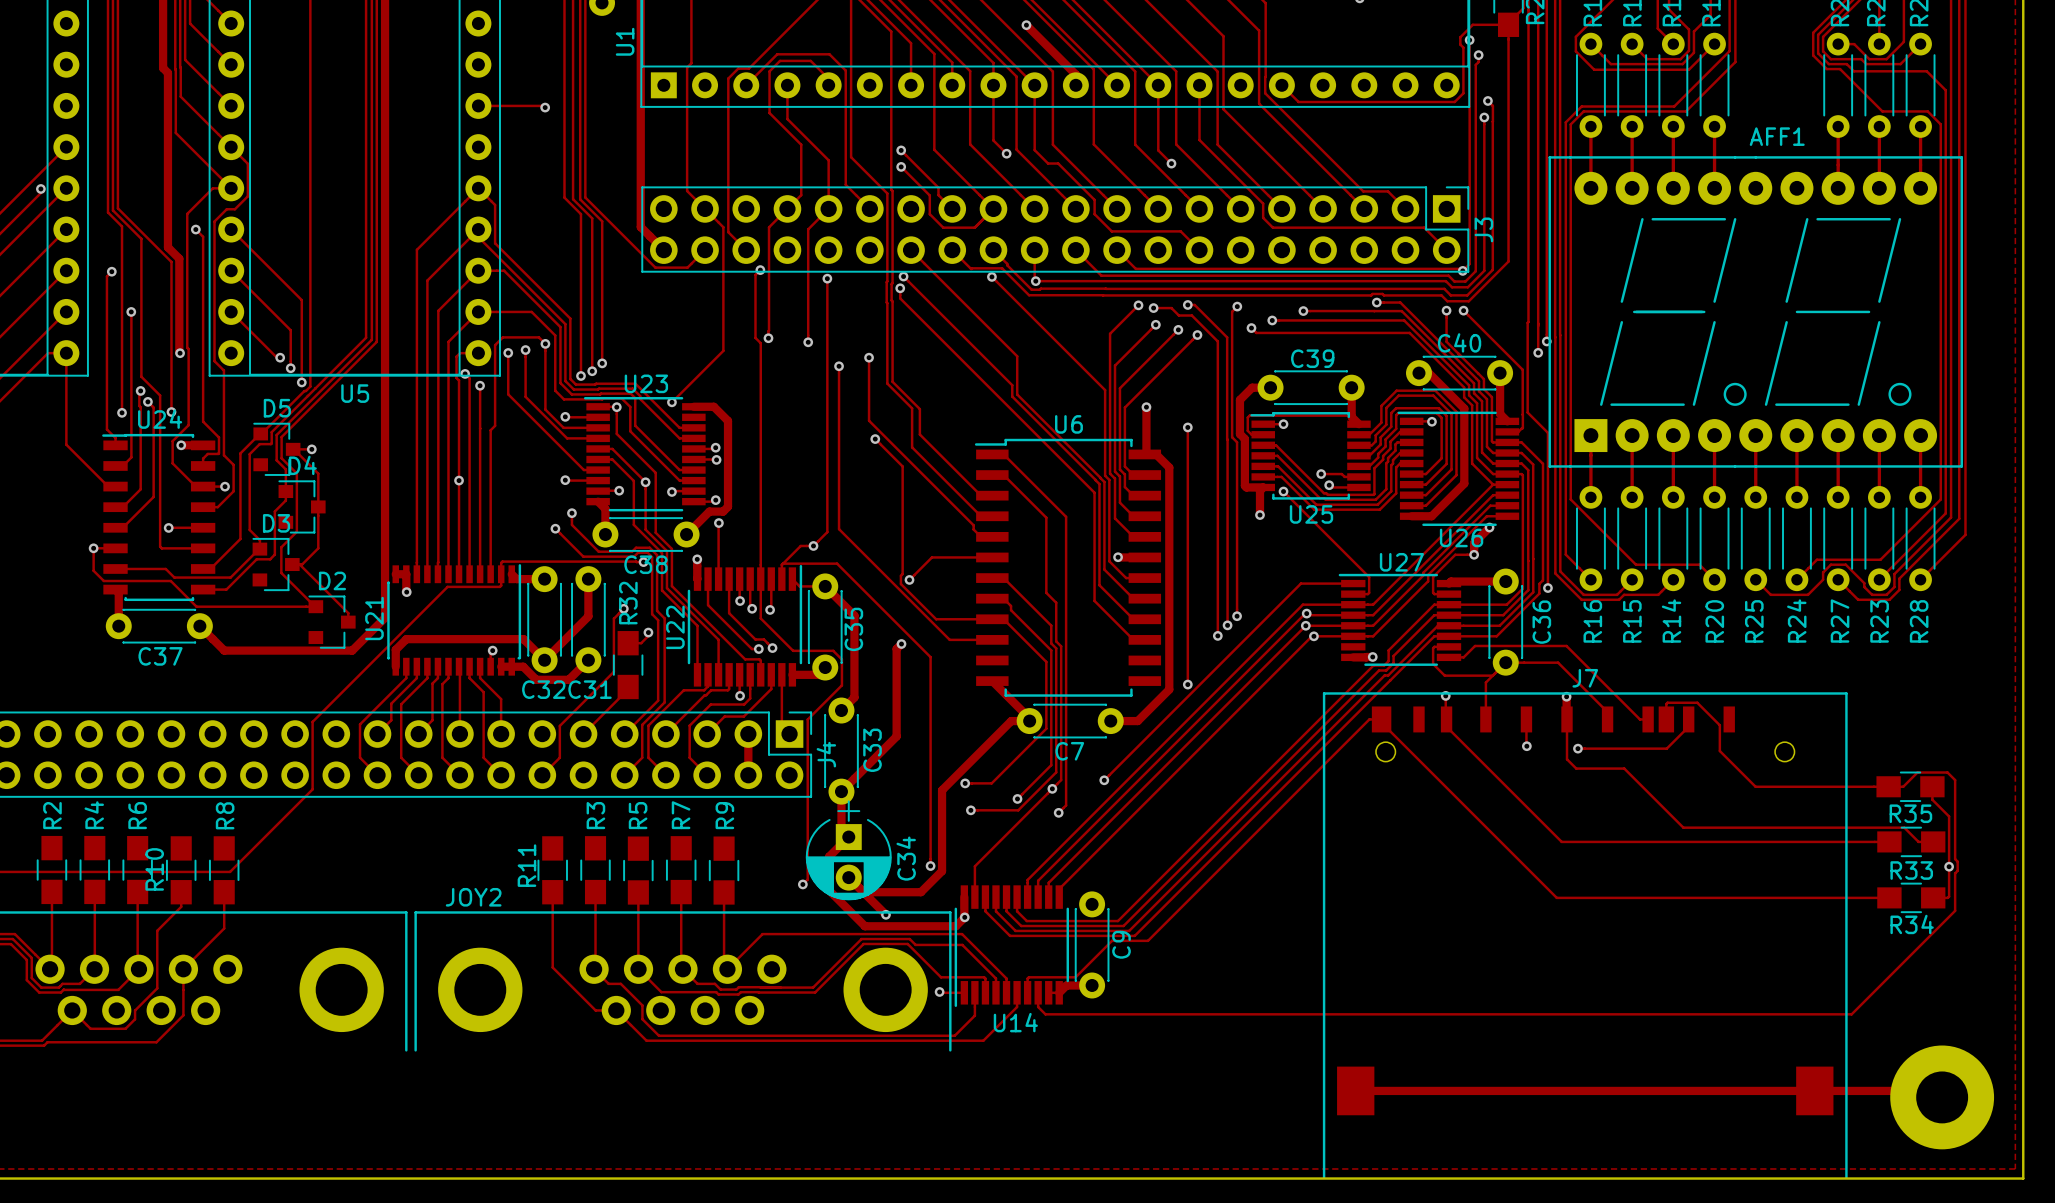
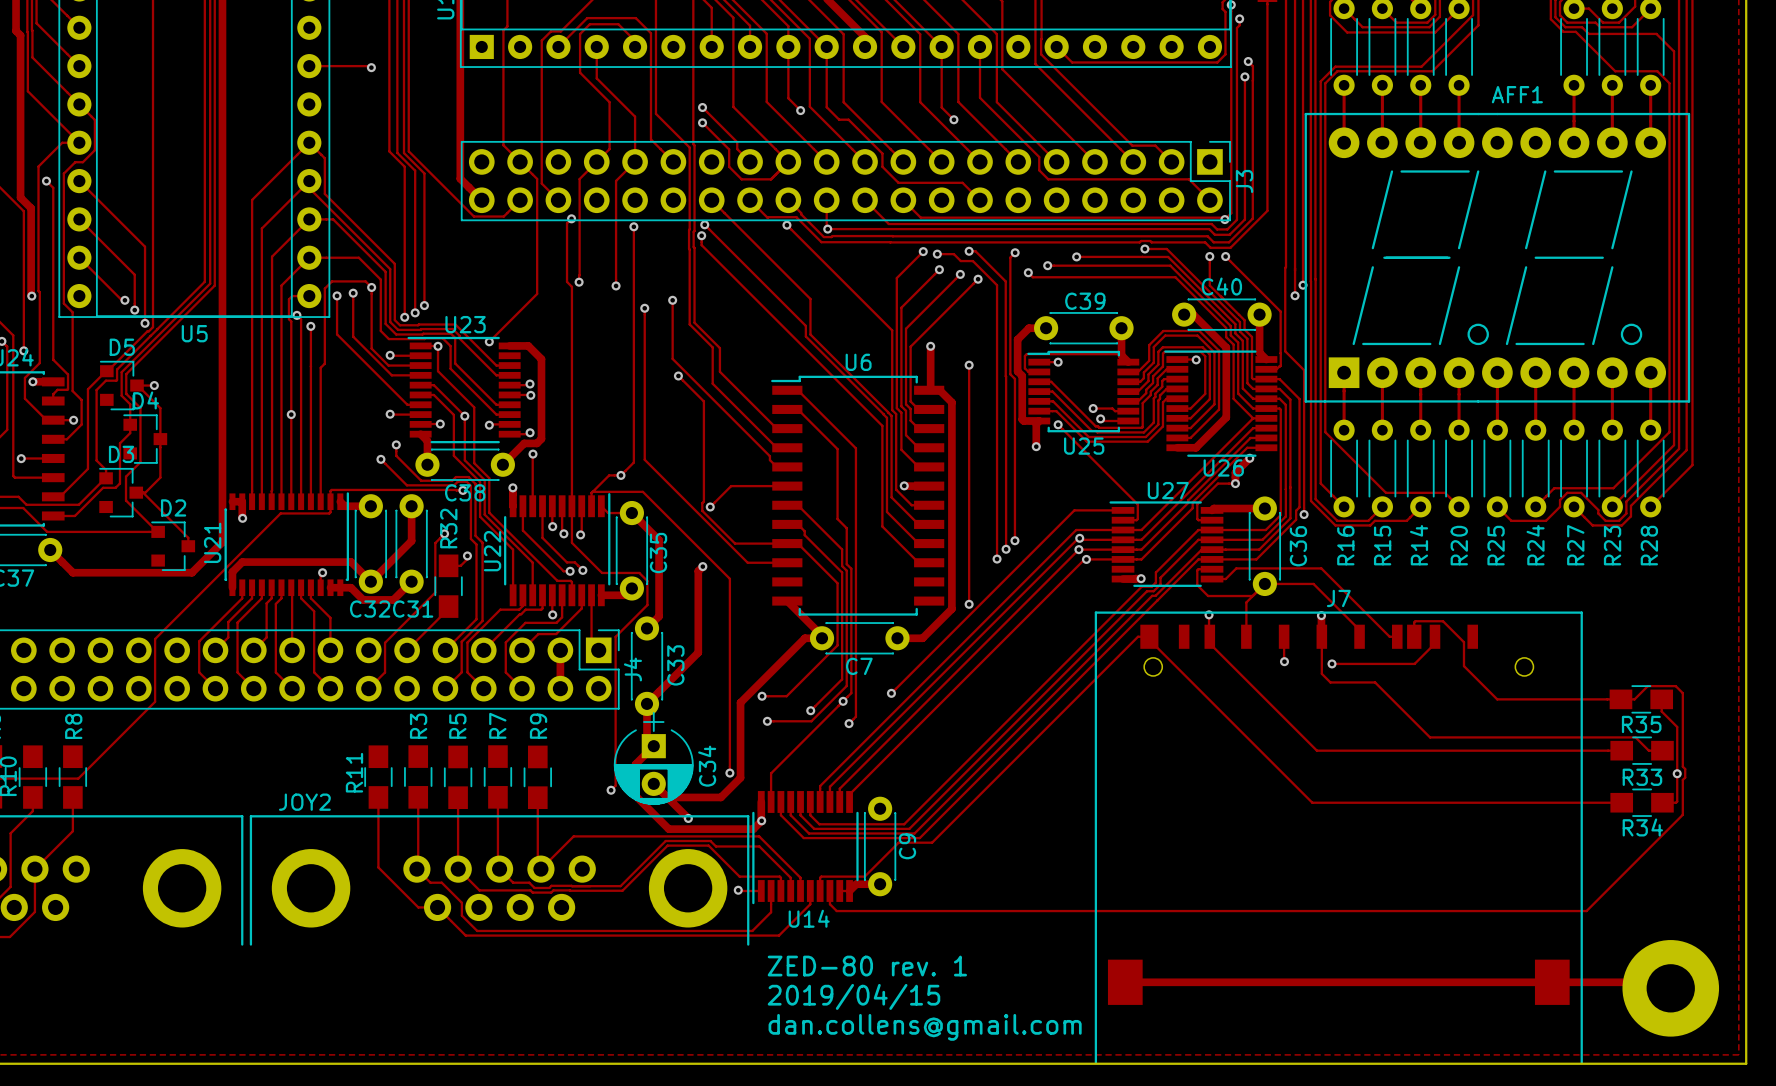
text: none -> ZED-80 rev. 1 (867, 966)
text: none -> 2019/04/15 (853, 996)
text: none -> dan.collens@gmail.com (925, 1027)

